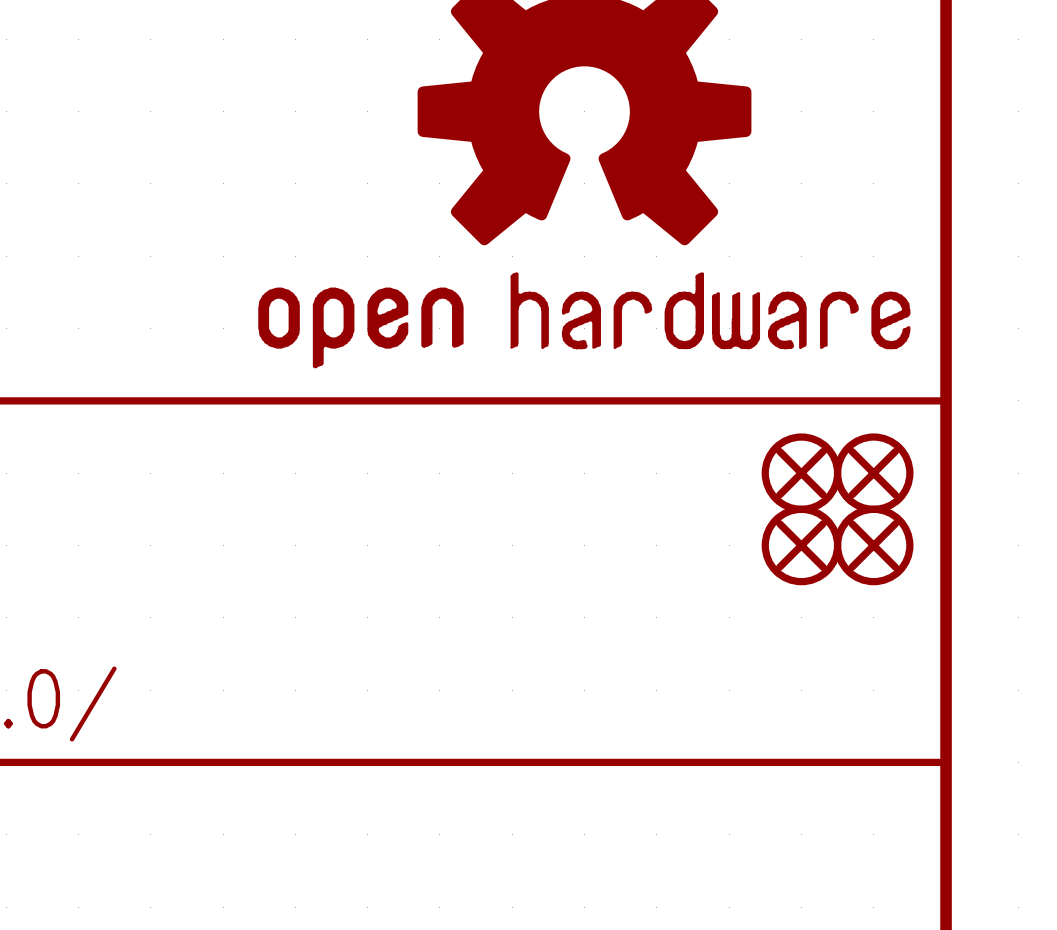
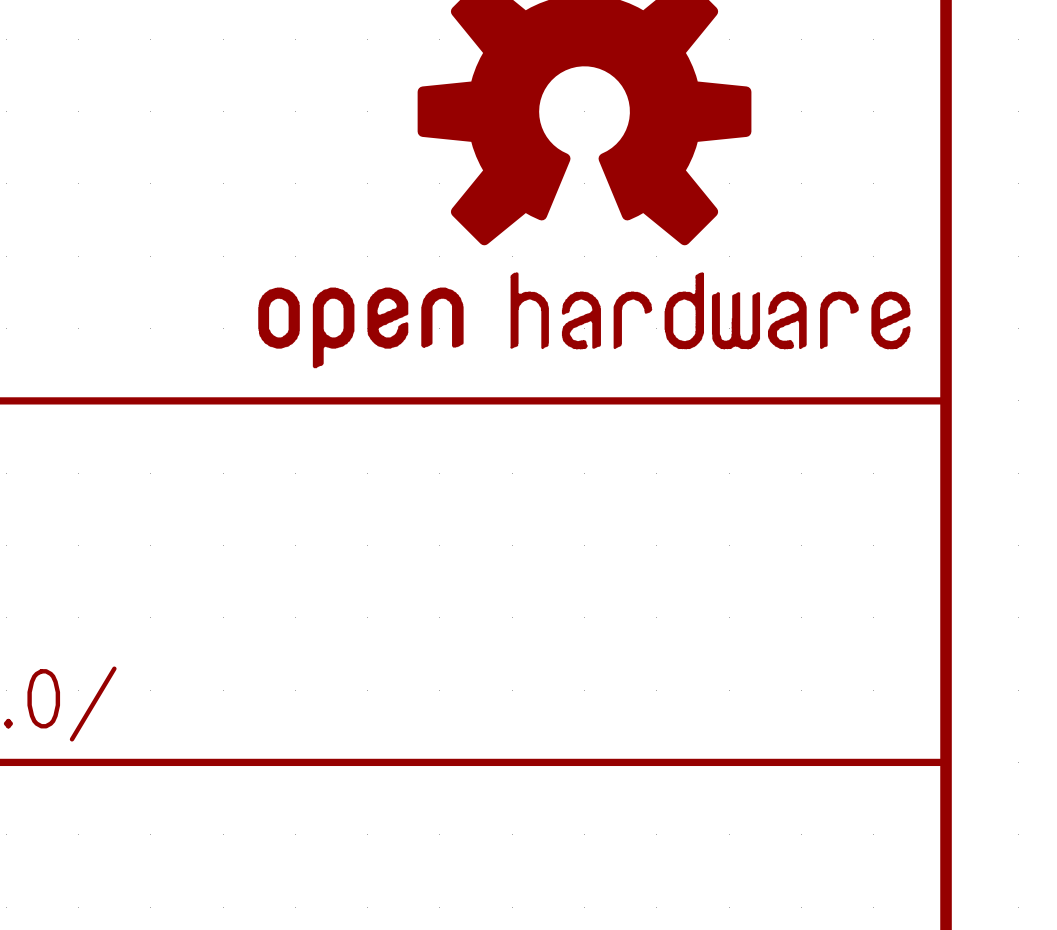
part: (801, 473) -> none
part: (873, 473) -> none
part: (801, 545) -> none
part: (873, 545) -> none

